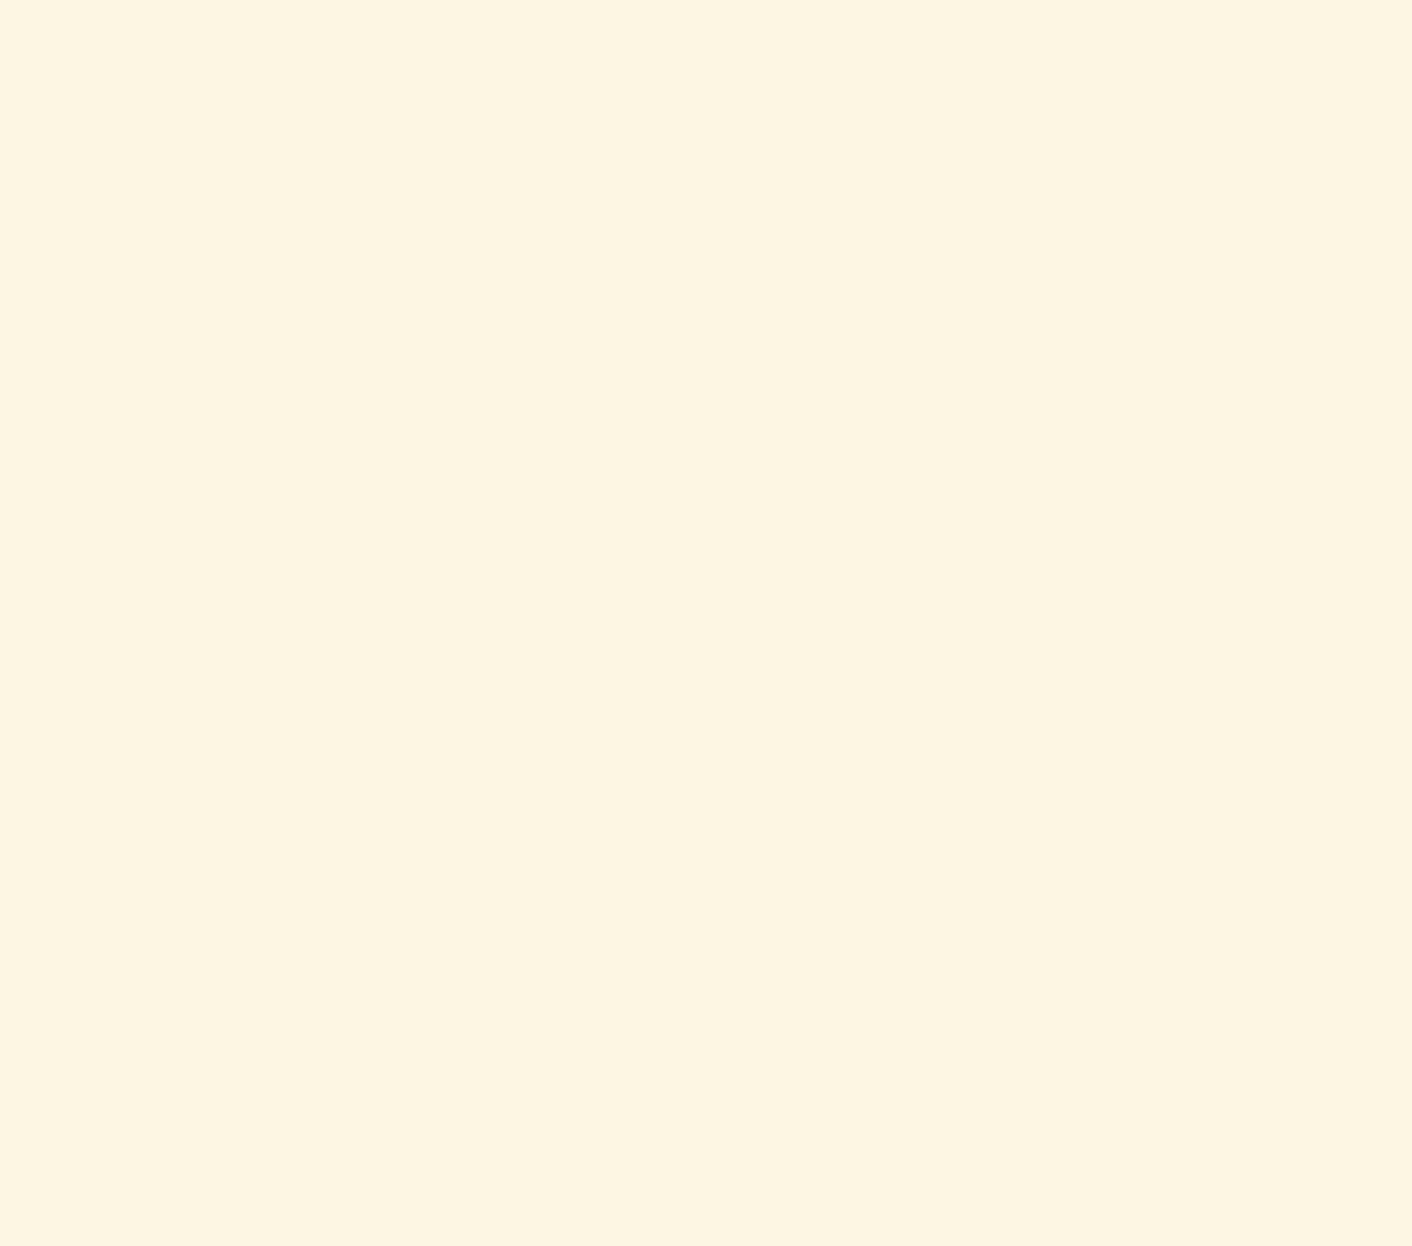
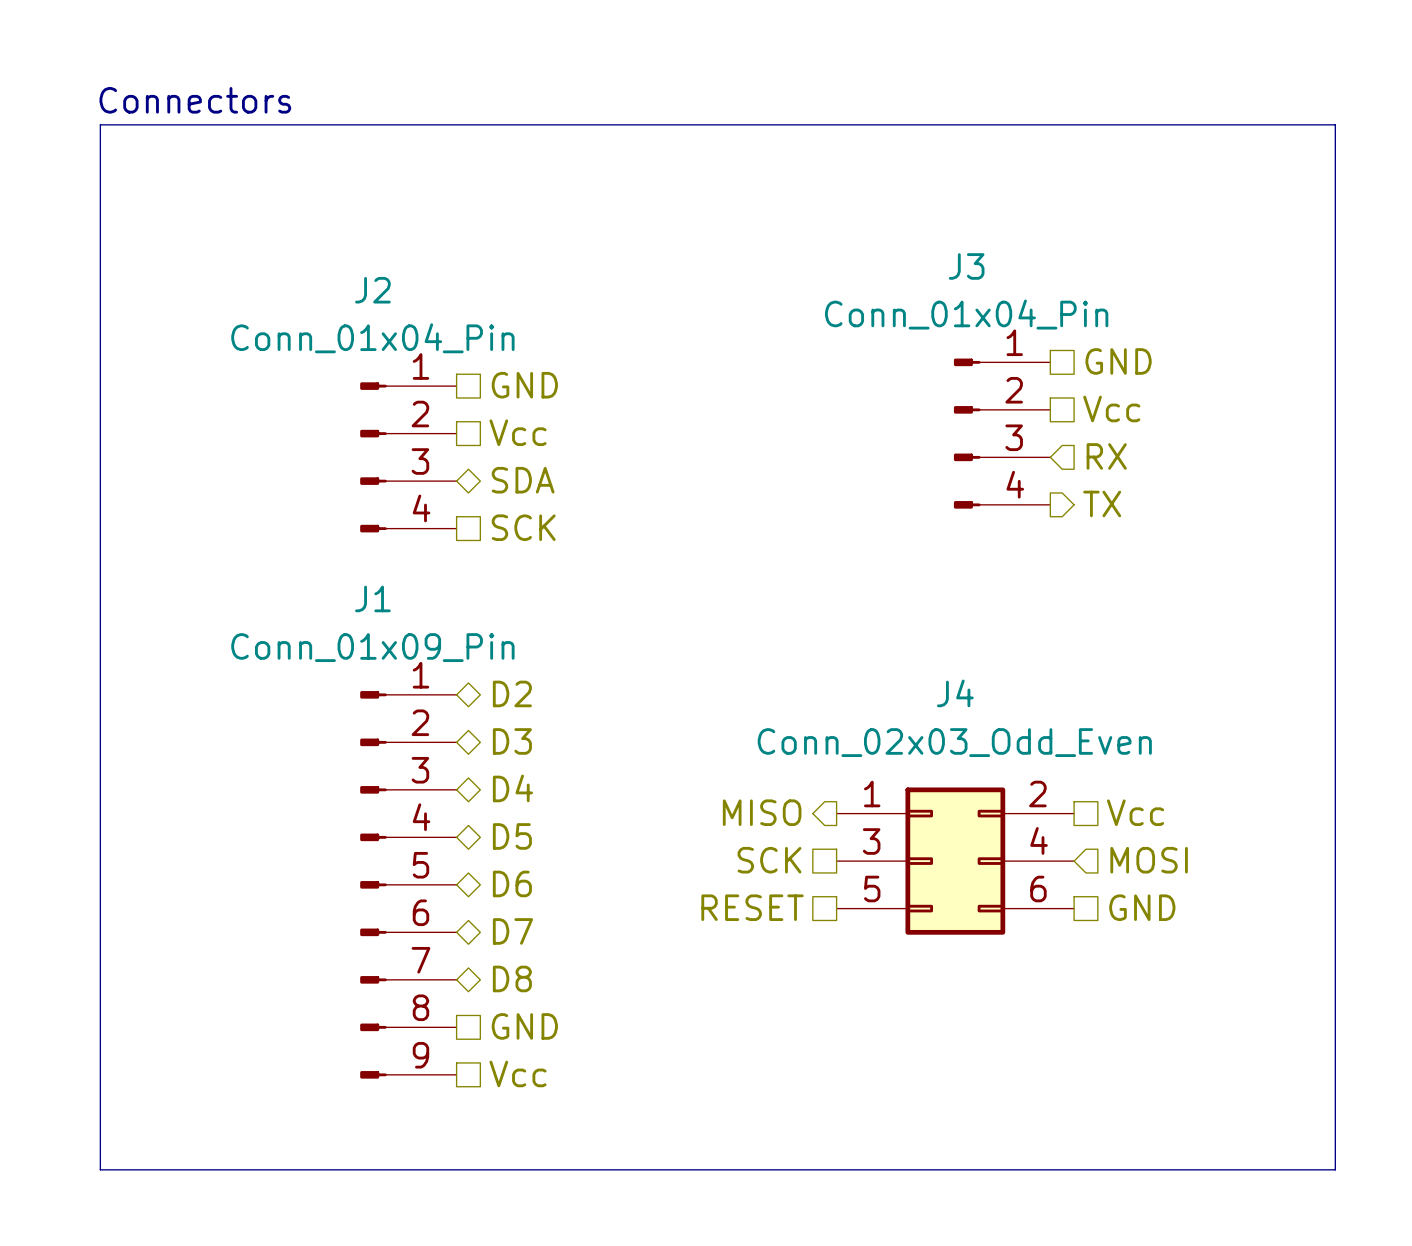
text: none -> Connectors (195, 100)
line: none -> (100, 124) (1335, 124) (1335, 1169) (100, 1169) (100, 124)
hierarchical label: none -> GND (1118, 361)
hierarchical label: none -> GND (524, 385)
hierarchical label: none -> Vcc (1111, 408)
hierarchical label: none -> Vcc (518, 432)
J3: none -> Conn_01x04_Pin (1002, 433)
hierarchical label: none -> RX (1106, 456)
J2: none -> Conn_01x04_Pin (408, 457)
hierarchical label: none -> SDA (523, 480)
hierarchical label: none -> TX (1102, 503)
hierarchical label: none -> SCK (523, 527)
hierarchical label: none -> D2 (512, 693)
hierarchical label: none -> D3 (512, 741)
hierarchical label: none -> D4 (512, 788)
hierarchical label: none -> MISO (762, 812)
hierarchical label: none -> Vcc (1135, 812)
hierarchical label: none -> D5 (512, 836)
hierarchical label: none -> SCK (769, 860)
hierarchical label: none -> MOSI (1149, 860)
J4: none -> Conn_02x03_Odd_Even (955, 861)
J1: none -> Conn_01x09_Pin (408, 884)
hierarchical label: none -> D6 (512, 883)
hierarchical label: none -> RESET (752, 907)
hierarchical label: none -> GND (1142, 907)
hierarchical label: none -> D7 (512, 931)
hierarchical label: none -> D8 (512, 978)
hierarchical label: none -> GND (524, 1026)
hierarchical label: none -> Vcc (518, 1073)

